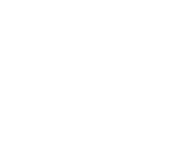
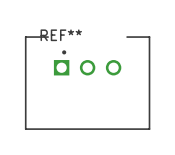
REF**: none -> (87, 83)

